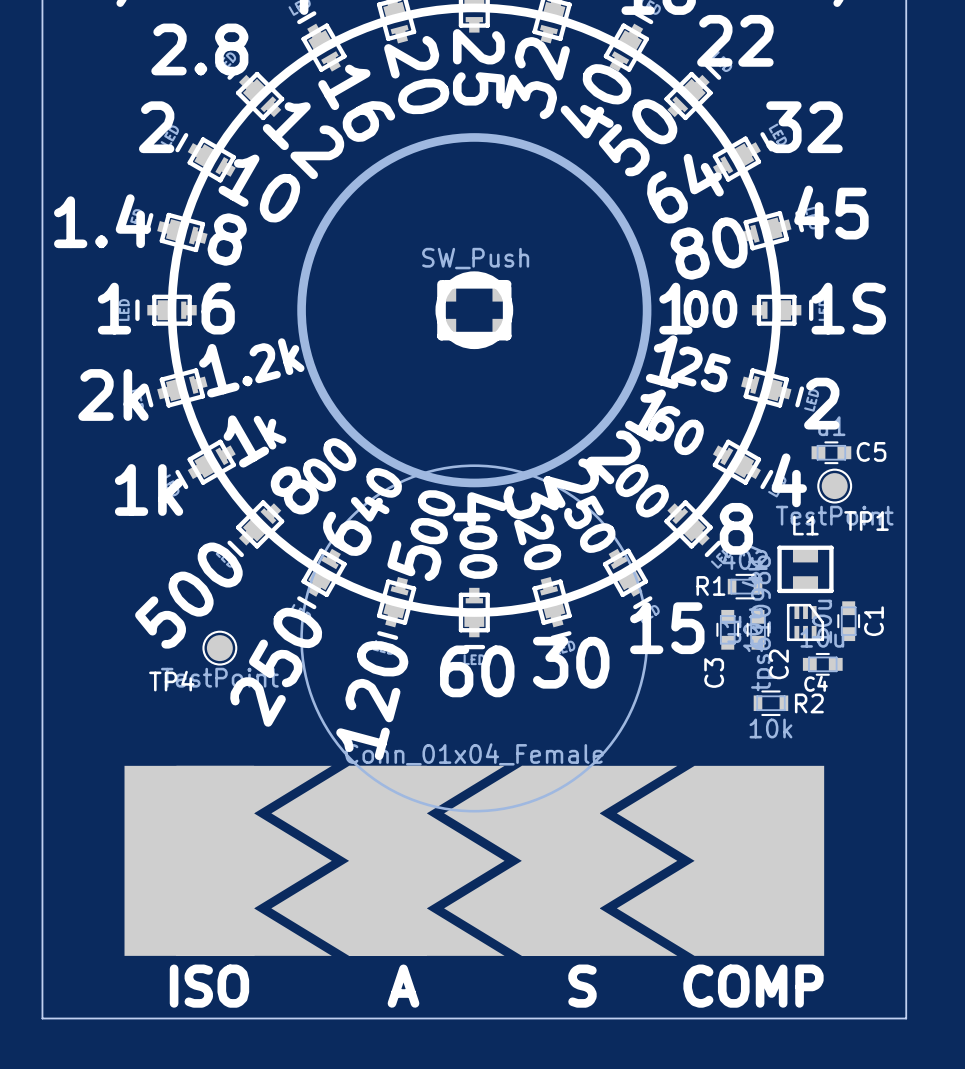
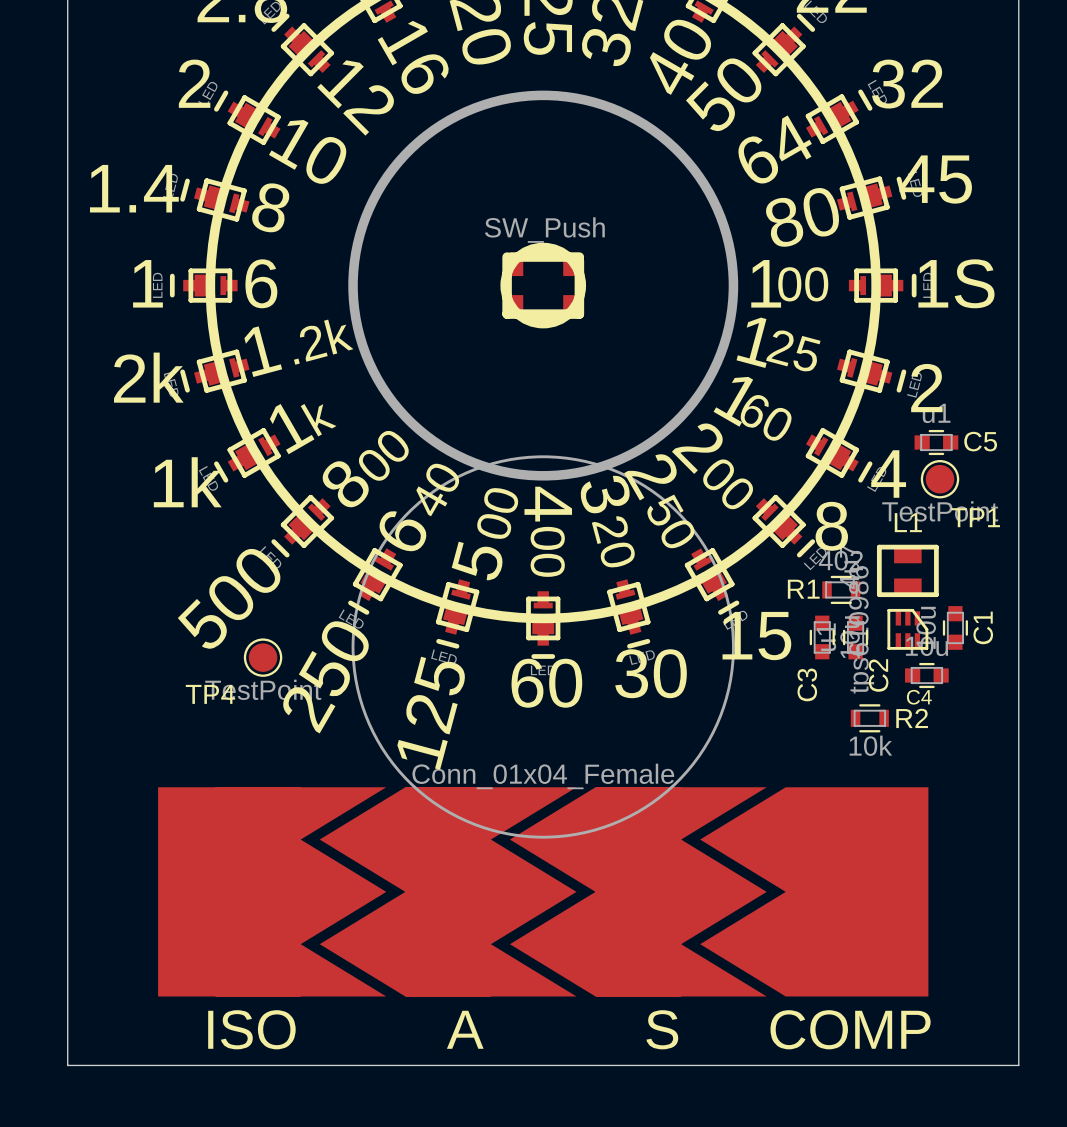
text: 120 (372, 700) -> 125 (431, 713)

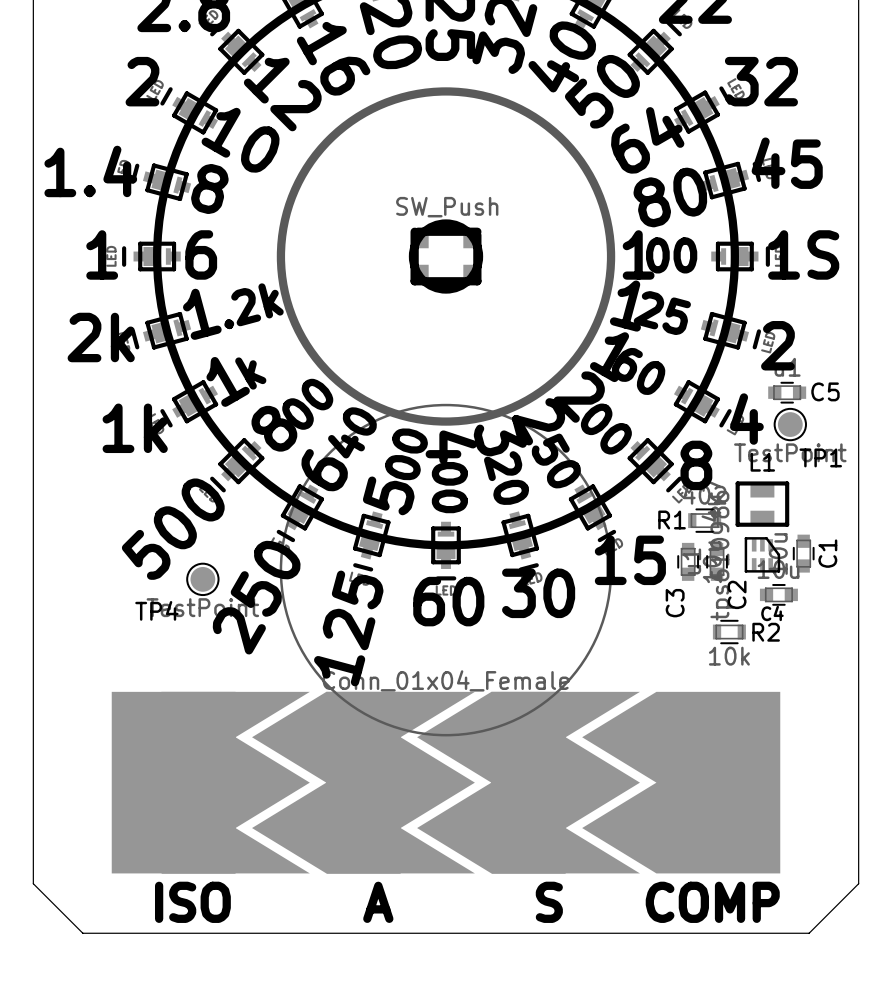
board edge: (67, 1008) (67, 1065) (124, 1065) -> (33, 883) (82, 933)
board edge: (1018, 1008) (1018, 1065) (961, 1065) -> (858, 883) (809, 933)

